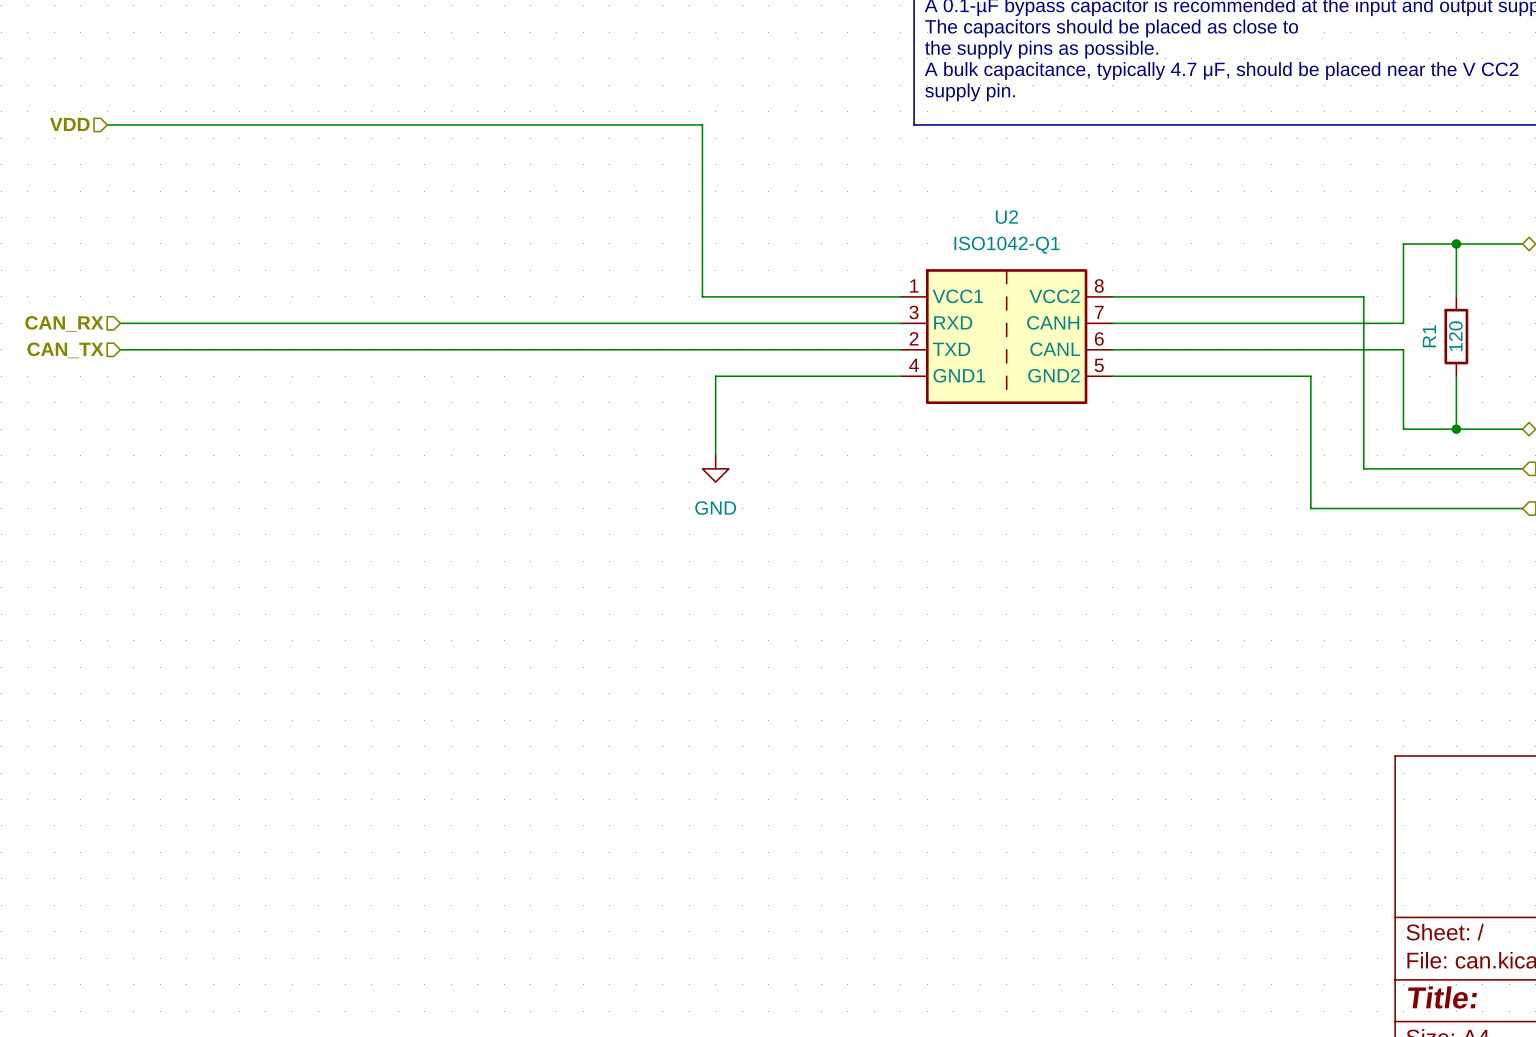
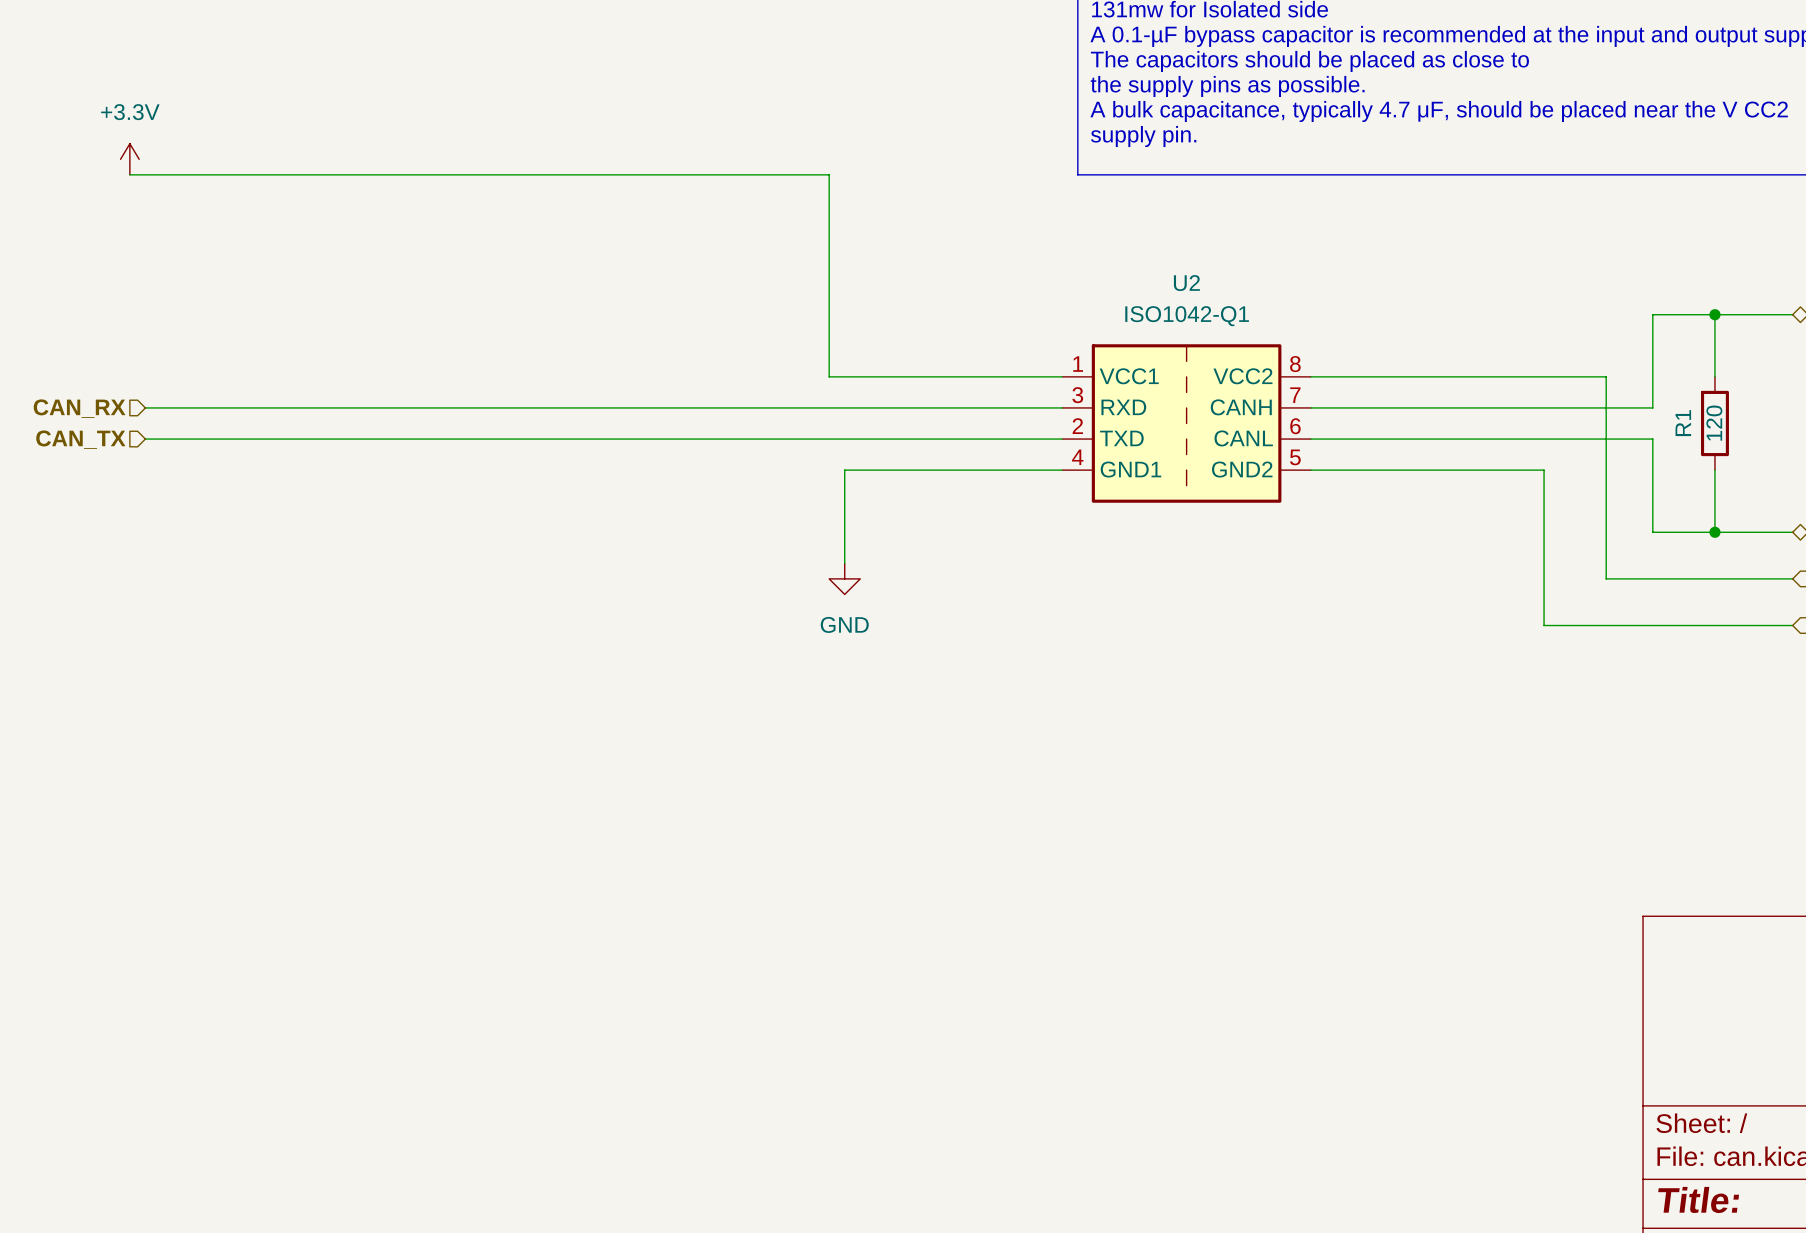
power symbol: none -> +3.3V (129, 159)
hierarchical label: VDD (69, 124) -> none

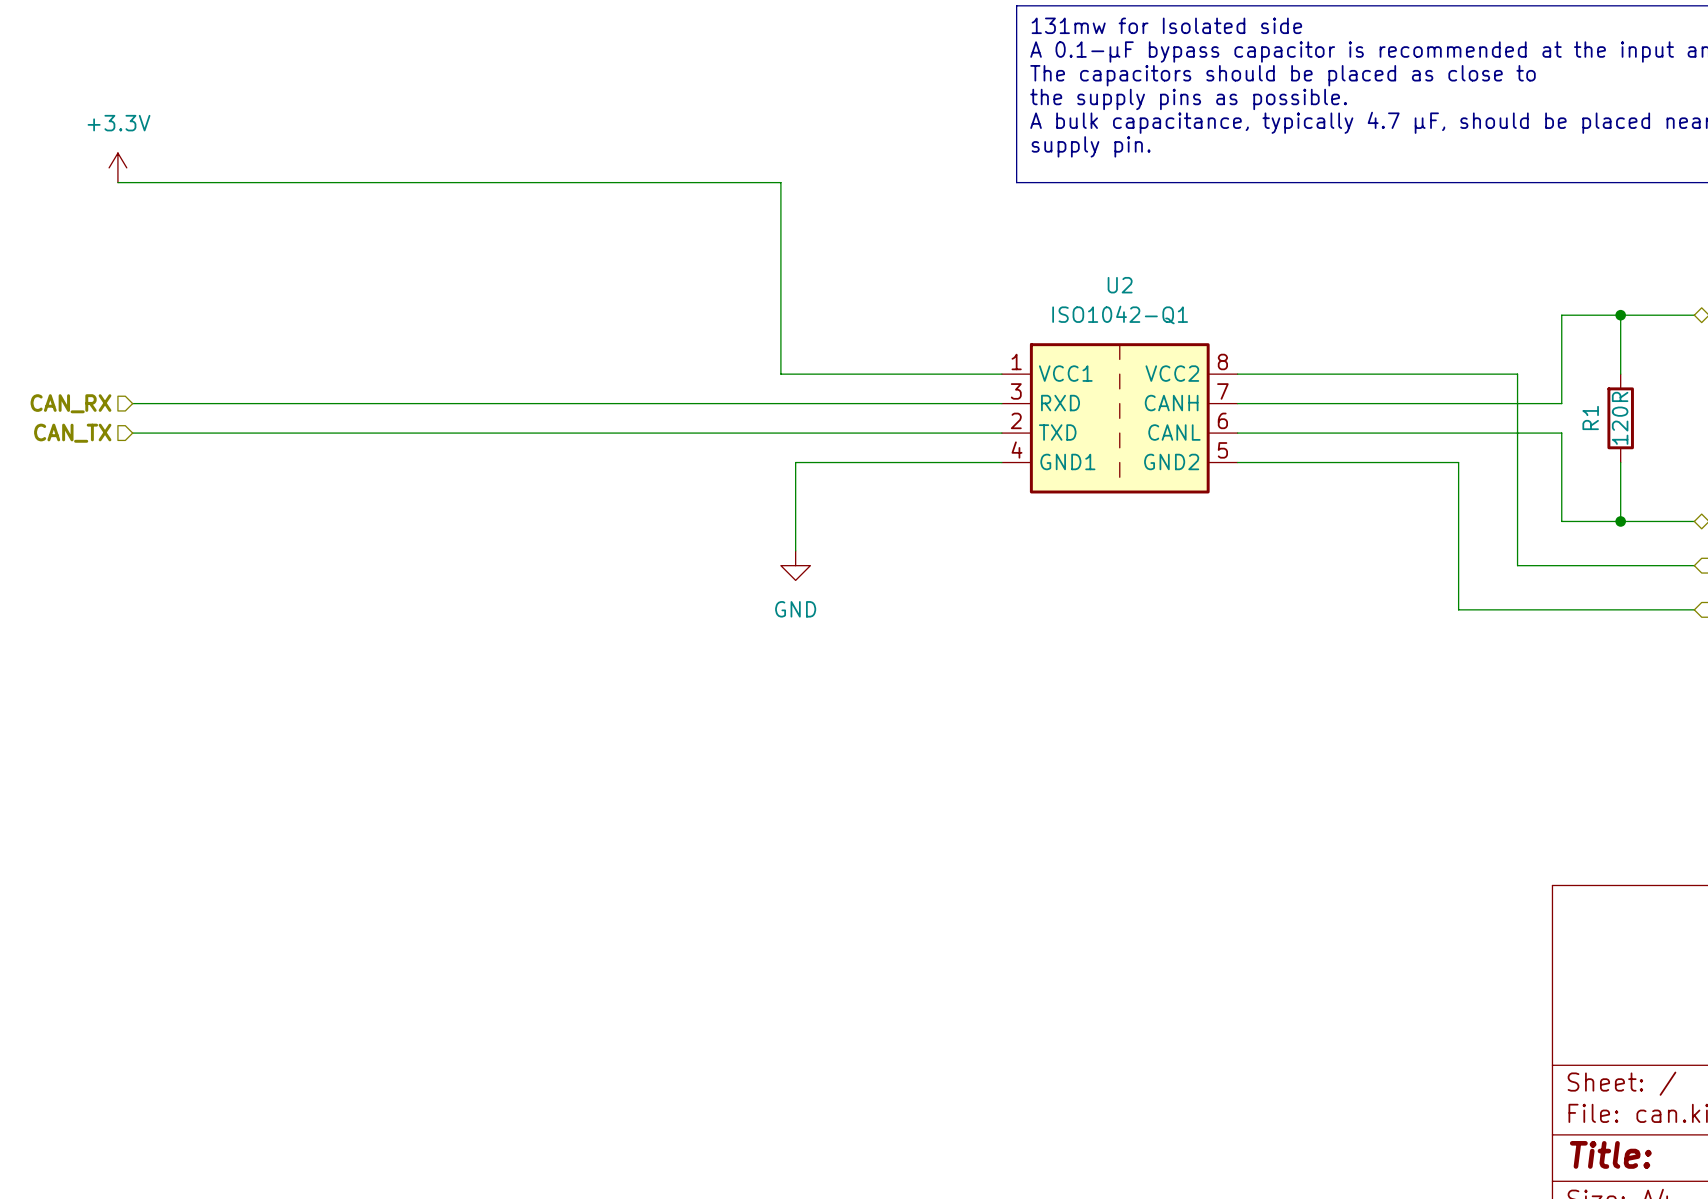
R1 value: 120 (1714, 423) -> 120R (1620, 418)

